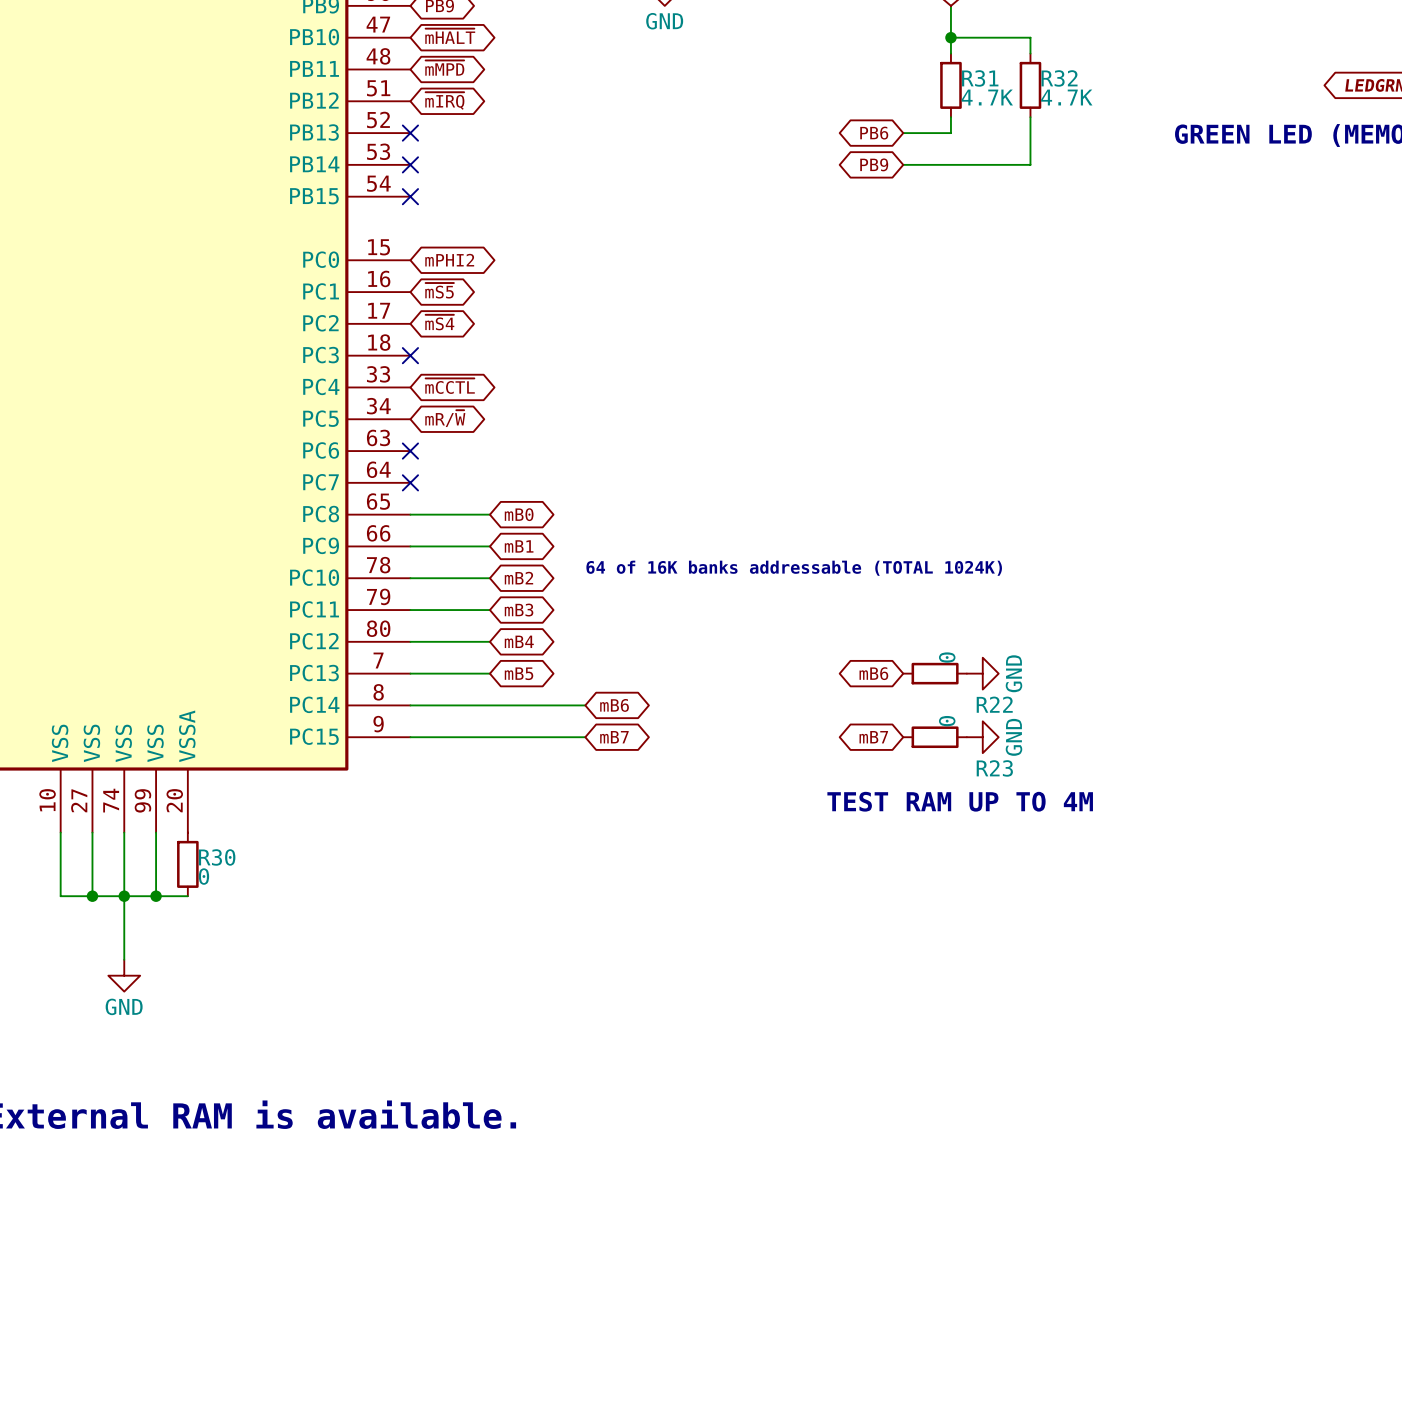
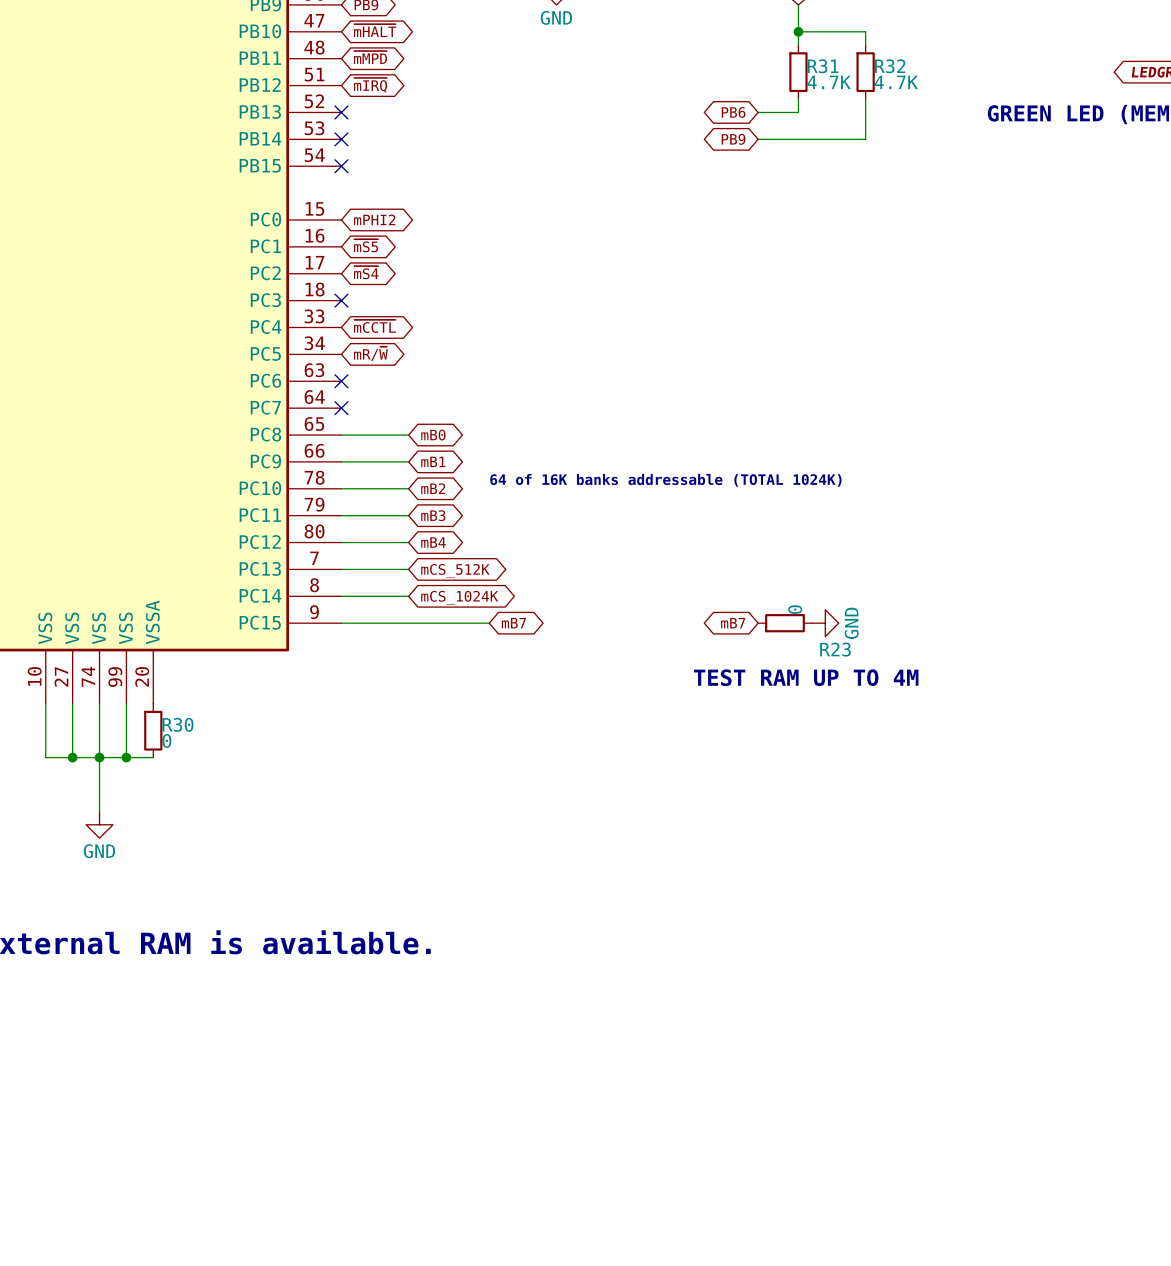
global label: mB5 (519, 673) -> mCS_512K (455, 571)
global label: mB6 (873, 673) -> none
R22: 0 (935, 673) -> none
power symbol: GND (982, 673) -> none
wire: (489, 705) (585, 705) -> none
global label: mB6 (614, 705) -> none
global label: none -> mCS_1024K (459, 597)

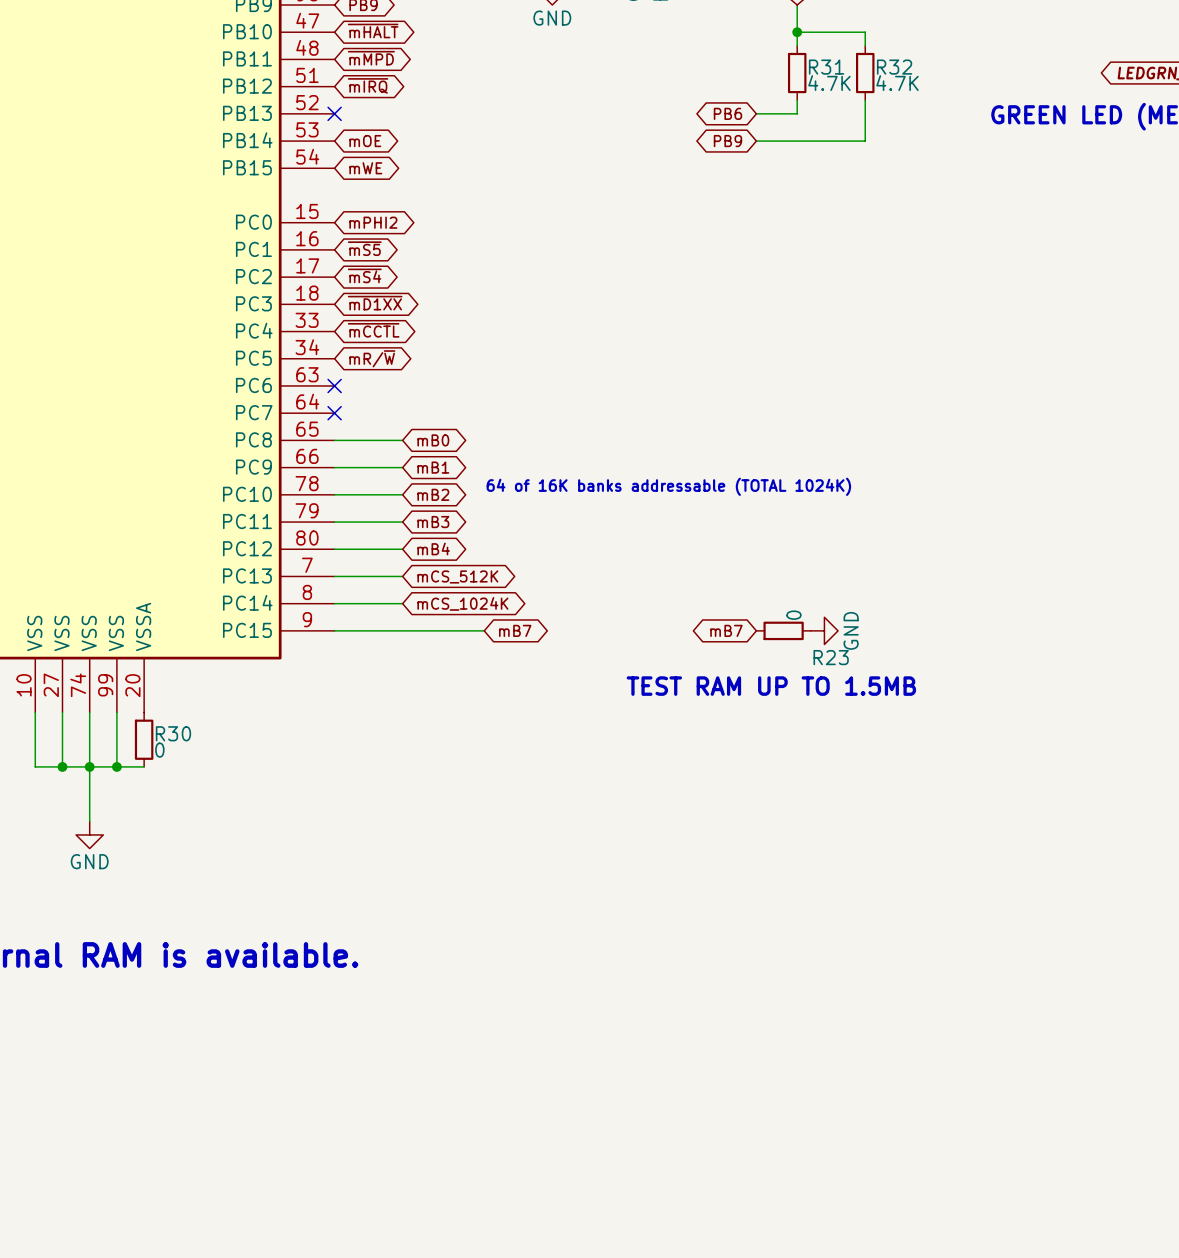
no-connect mark: (341, 139) -> none
global label: none -> mOE (365, 141)
no-connect mark: (341, 166) -> none
global label: none -> mWE (365, 168)
global label: none -> ~{mD1XX} (375, 303)
no-connect mark: (341, 300) -> none
text: TEST RAM UP TO 4M (806, 677) -> TEST RAM UP TO 1.5MB (771, 686)

